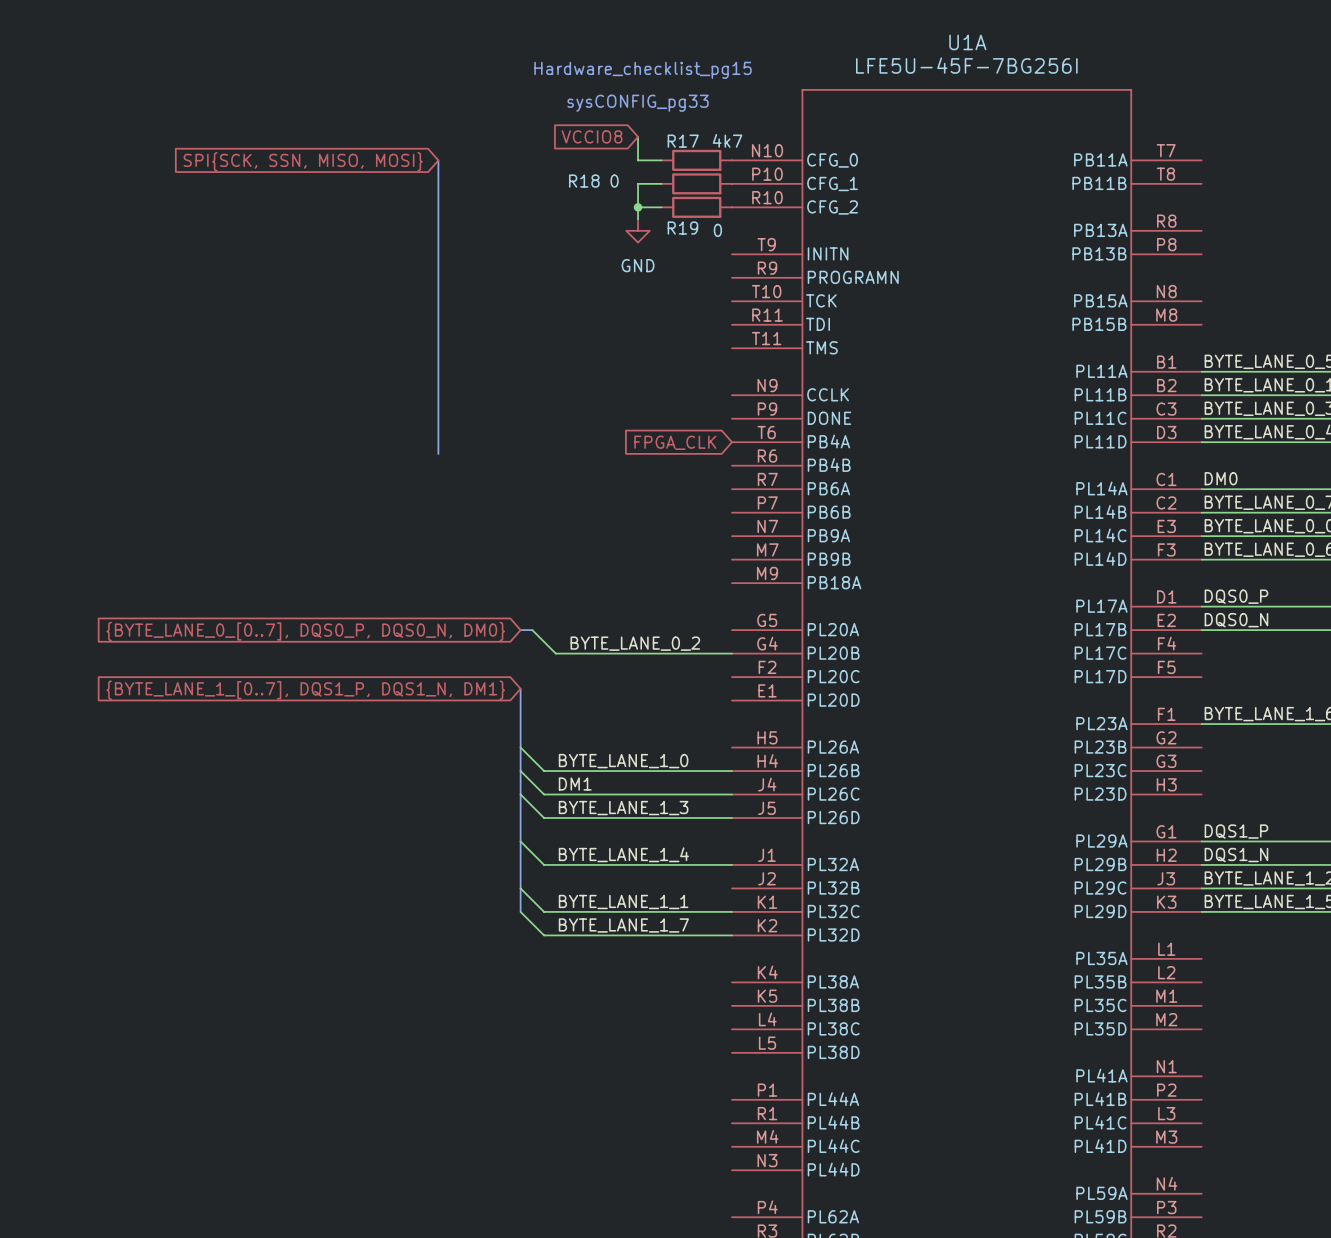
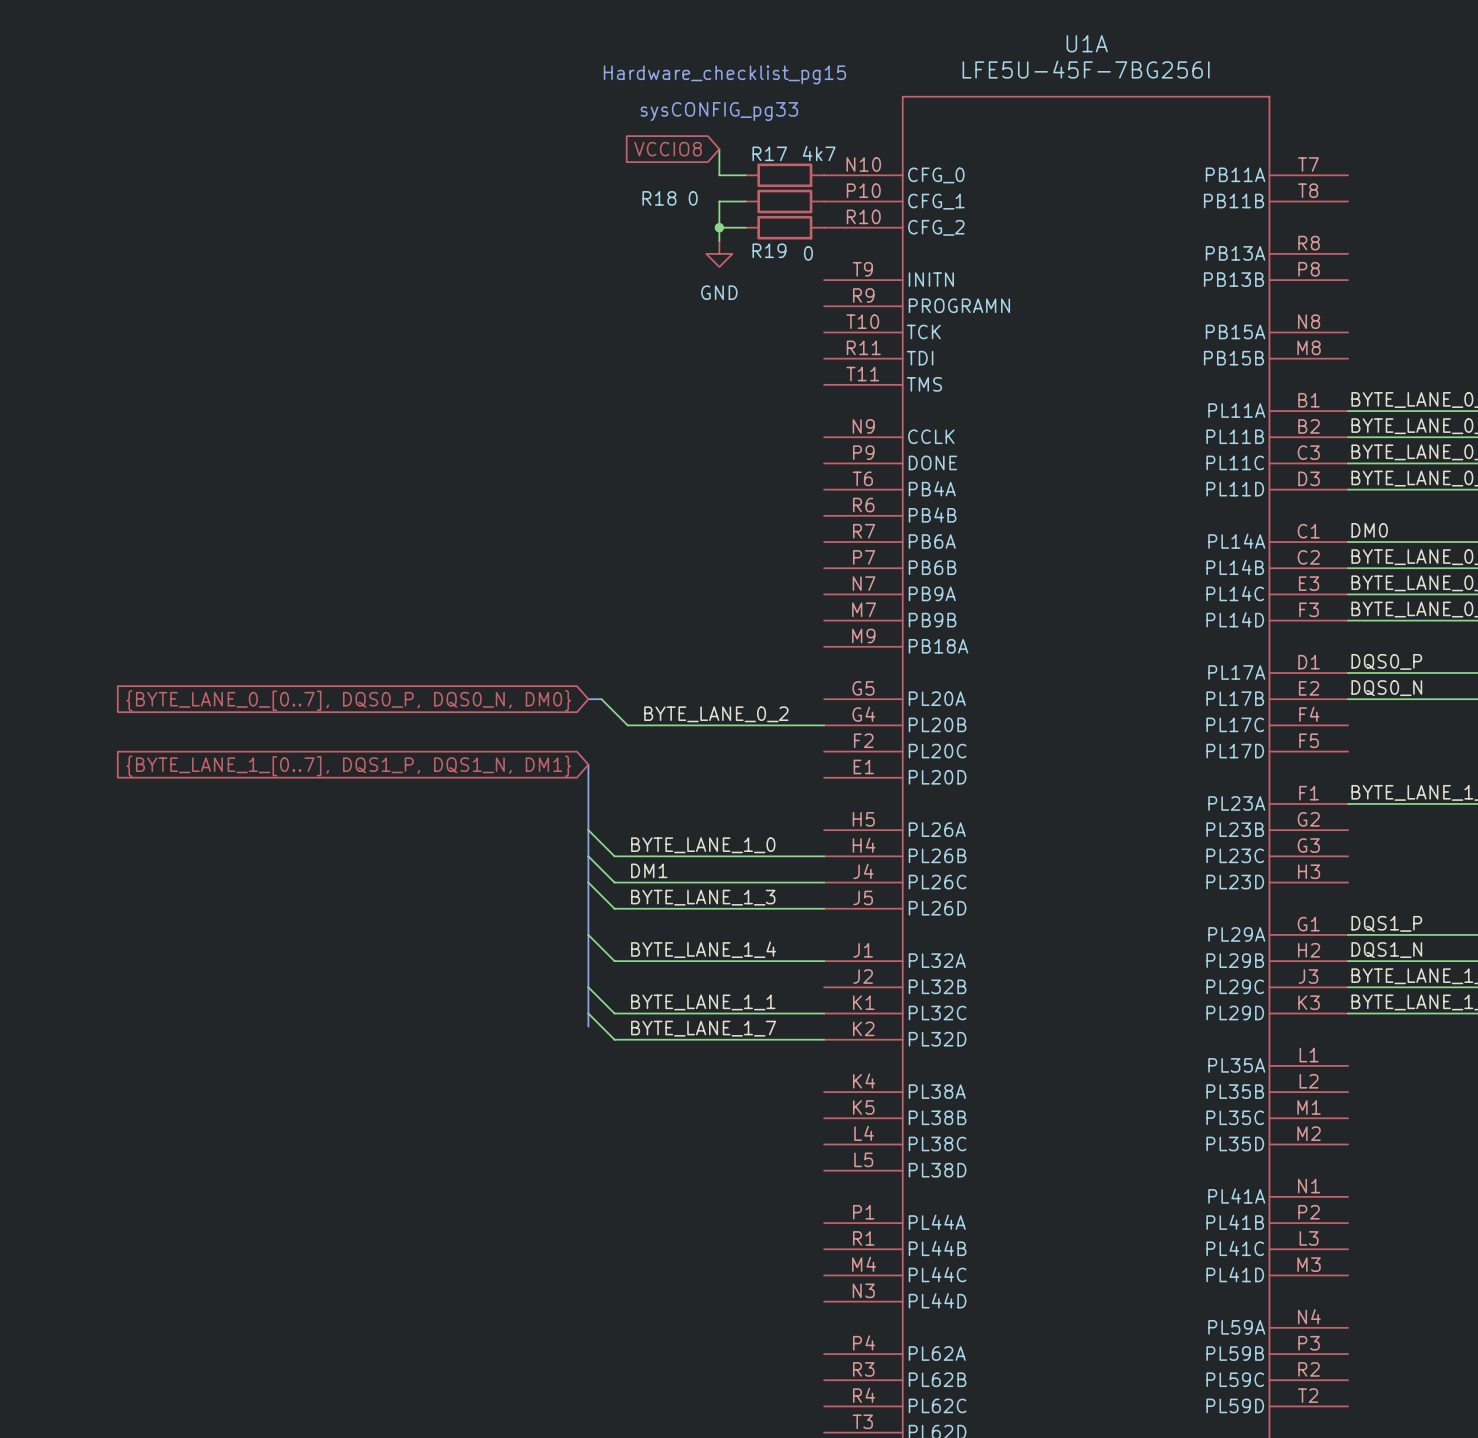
bus: (438, 160) (438, 453) -> none
global label: SPI{SCK, SSN, MISO, MOSI} (303, 161) -> none
global label: FPGA_CLK (675, 442) -> none
bus: none -> (588, 1013) (588, 1026)

